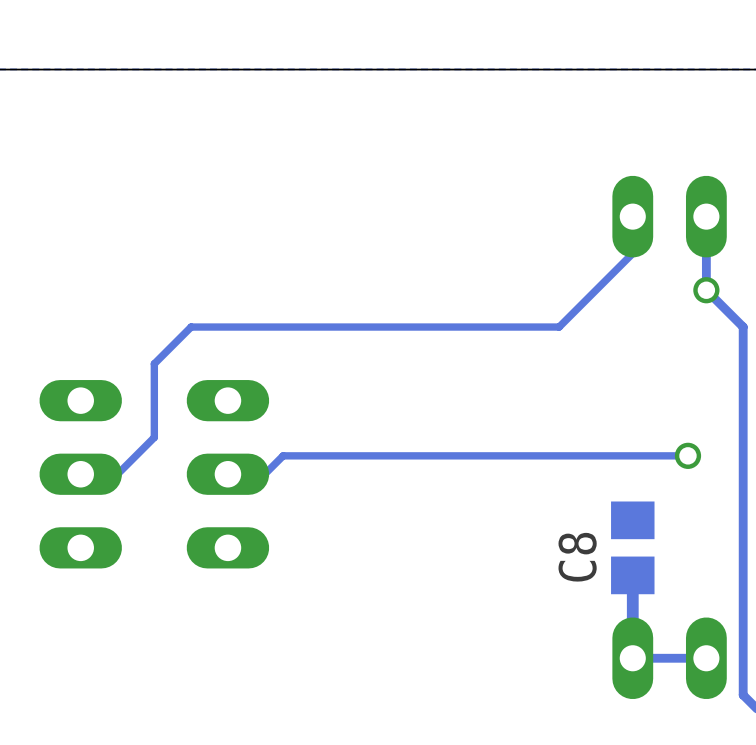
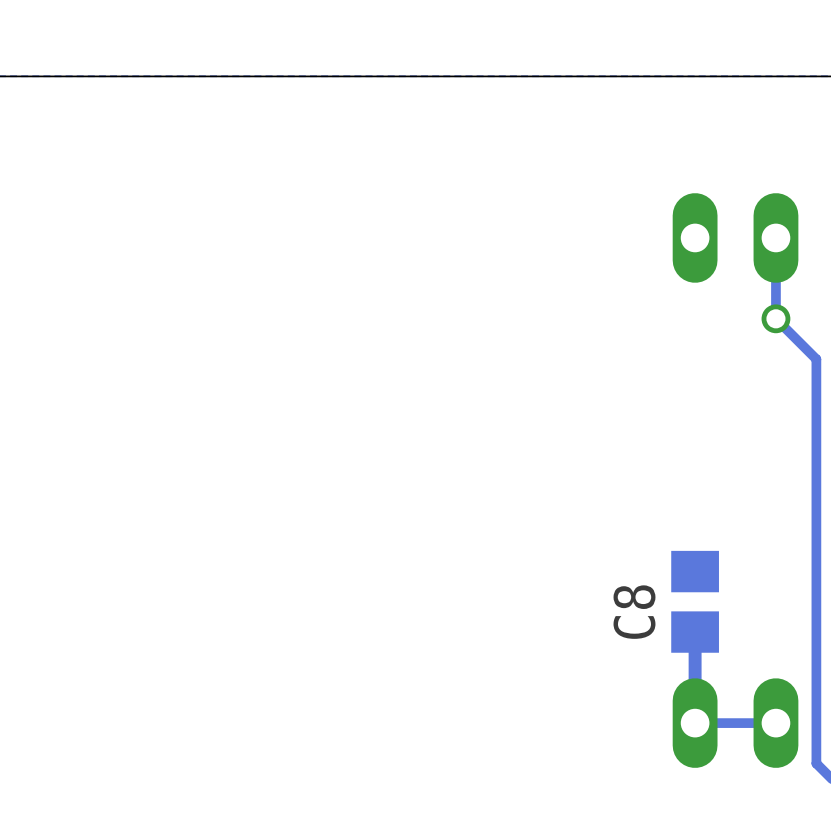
track: (632, 216) (632, 253) (559, 327) (191, 327) (154, 363) (154, 437) (117, 474) (80, 474) -> none
track: (687, 455) (283, 455) (264, 474) (227, 474) -> none
via: (687, 455) -> none
part: (80, 474) -> none
part: (227, 474) -> none

